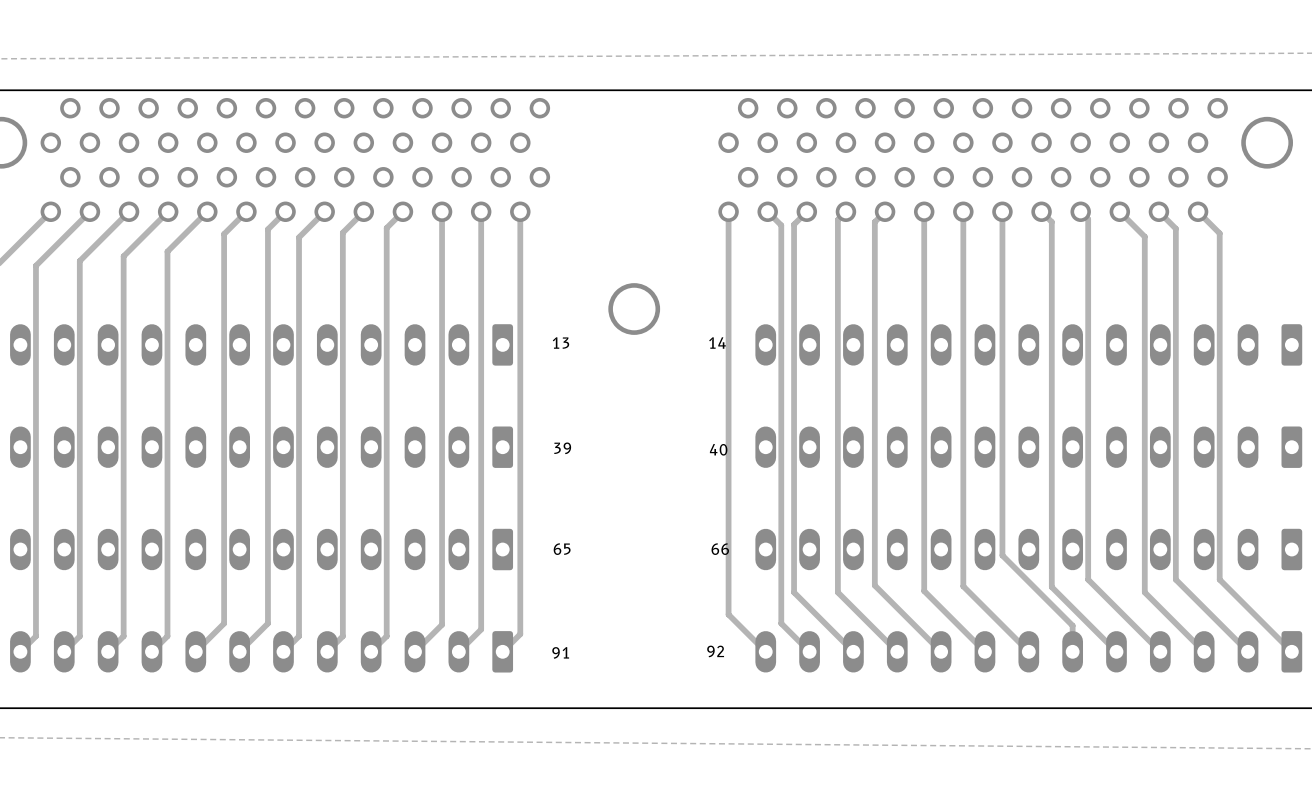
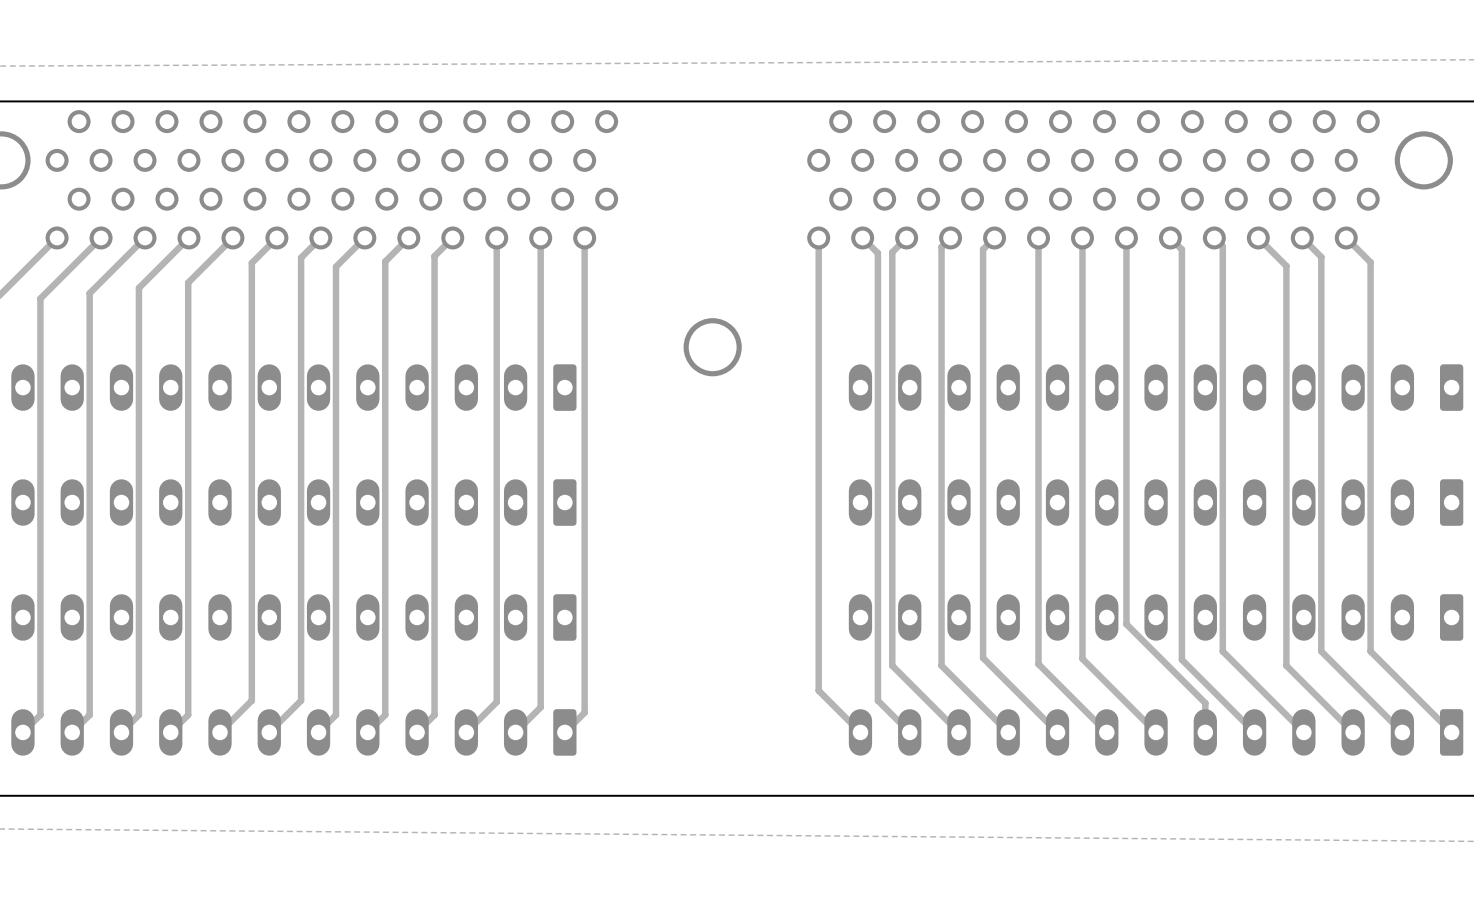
text: 13 (560, 343) -> none
text: 14 (717, 343) -> none
text: 39 (562, 448) -> none
text: 40 (718, 449) -> none
text: 65 (562, 549) -> none
text: 66 (720, 549) -> none
text: 92 (715, 651) -> none
text: 91 (560, 652) -> none

